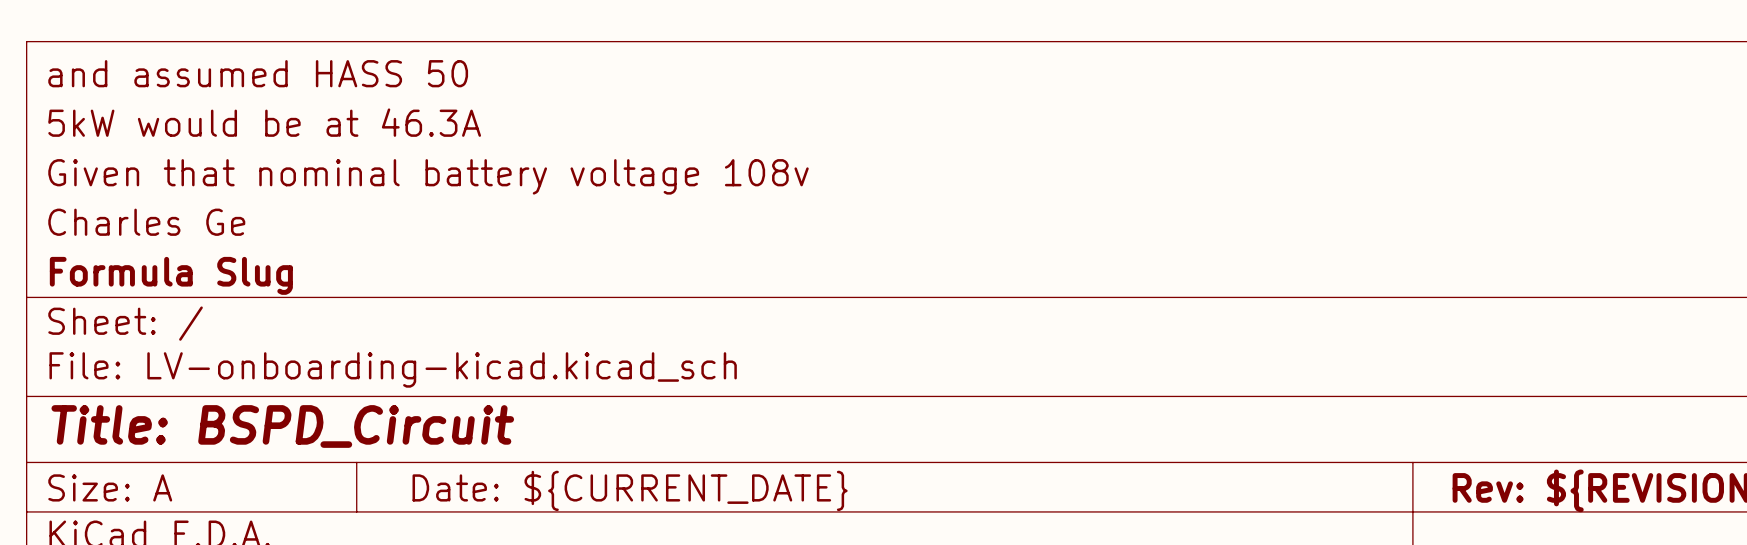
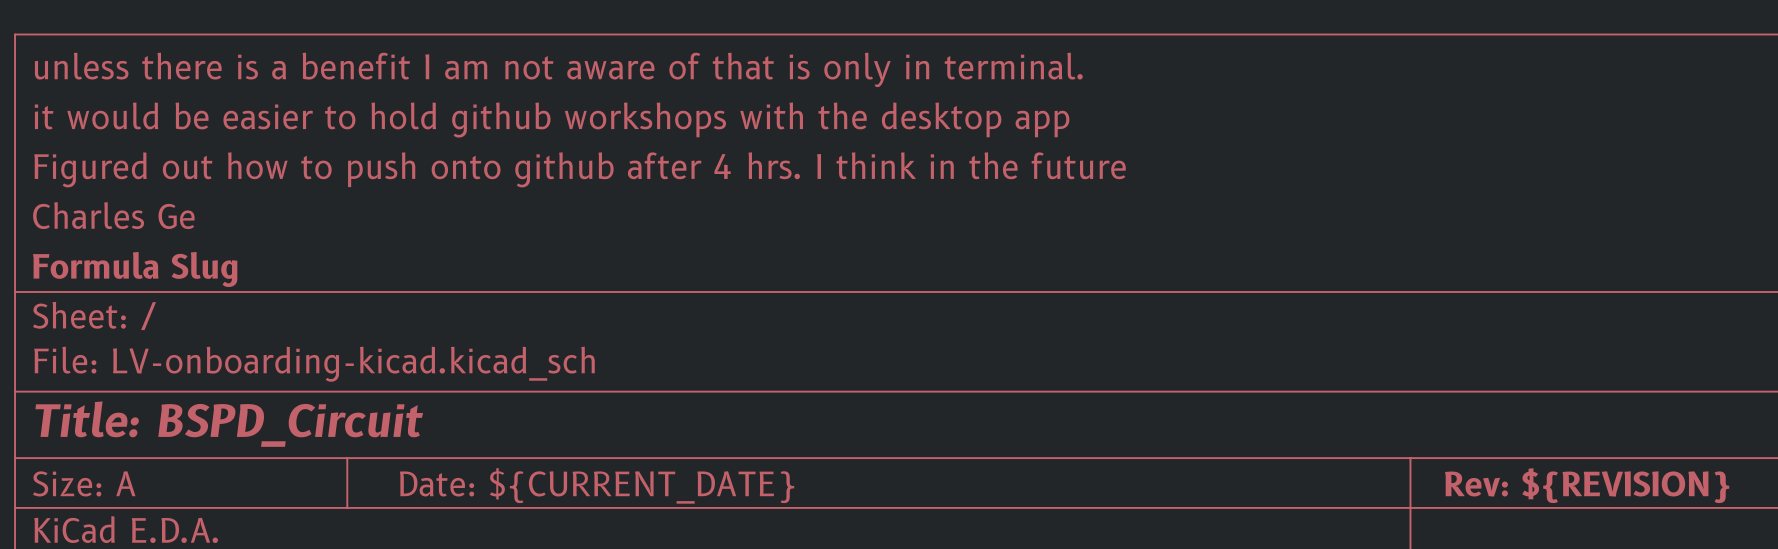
title block: and assumed HASS 50 (258, 73) -> unless there is a benefit I am not aware of that is only in terminal. (558, 69)
title block: 5kW would be at 46.3A (264, 122) -> it would be easier to hold github workshops with the desktop app (552, 120)
title block: Given that nominal battery voltage 108v (428, 176) -> Figured out how to push onto github after 4 hrs. I think in the future (580, 169)

